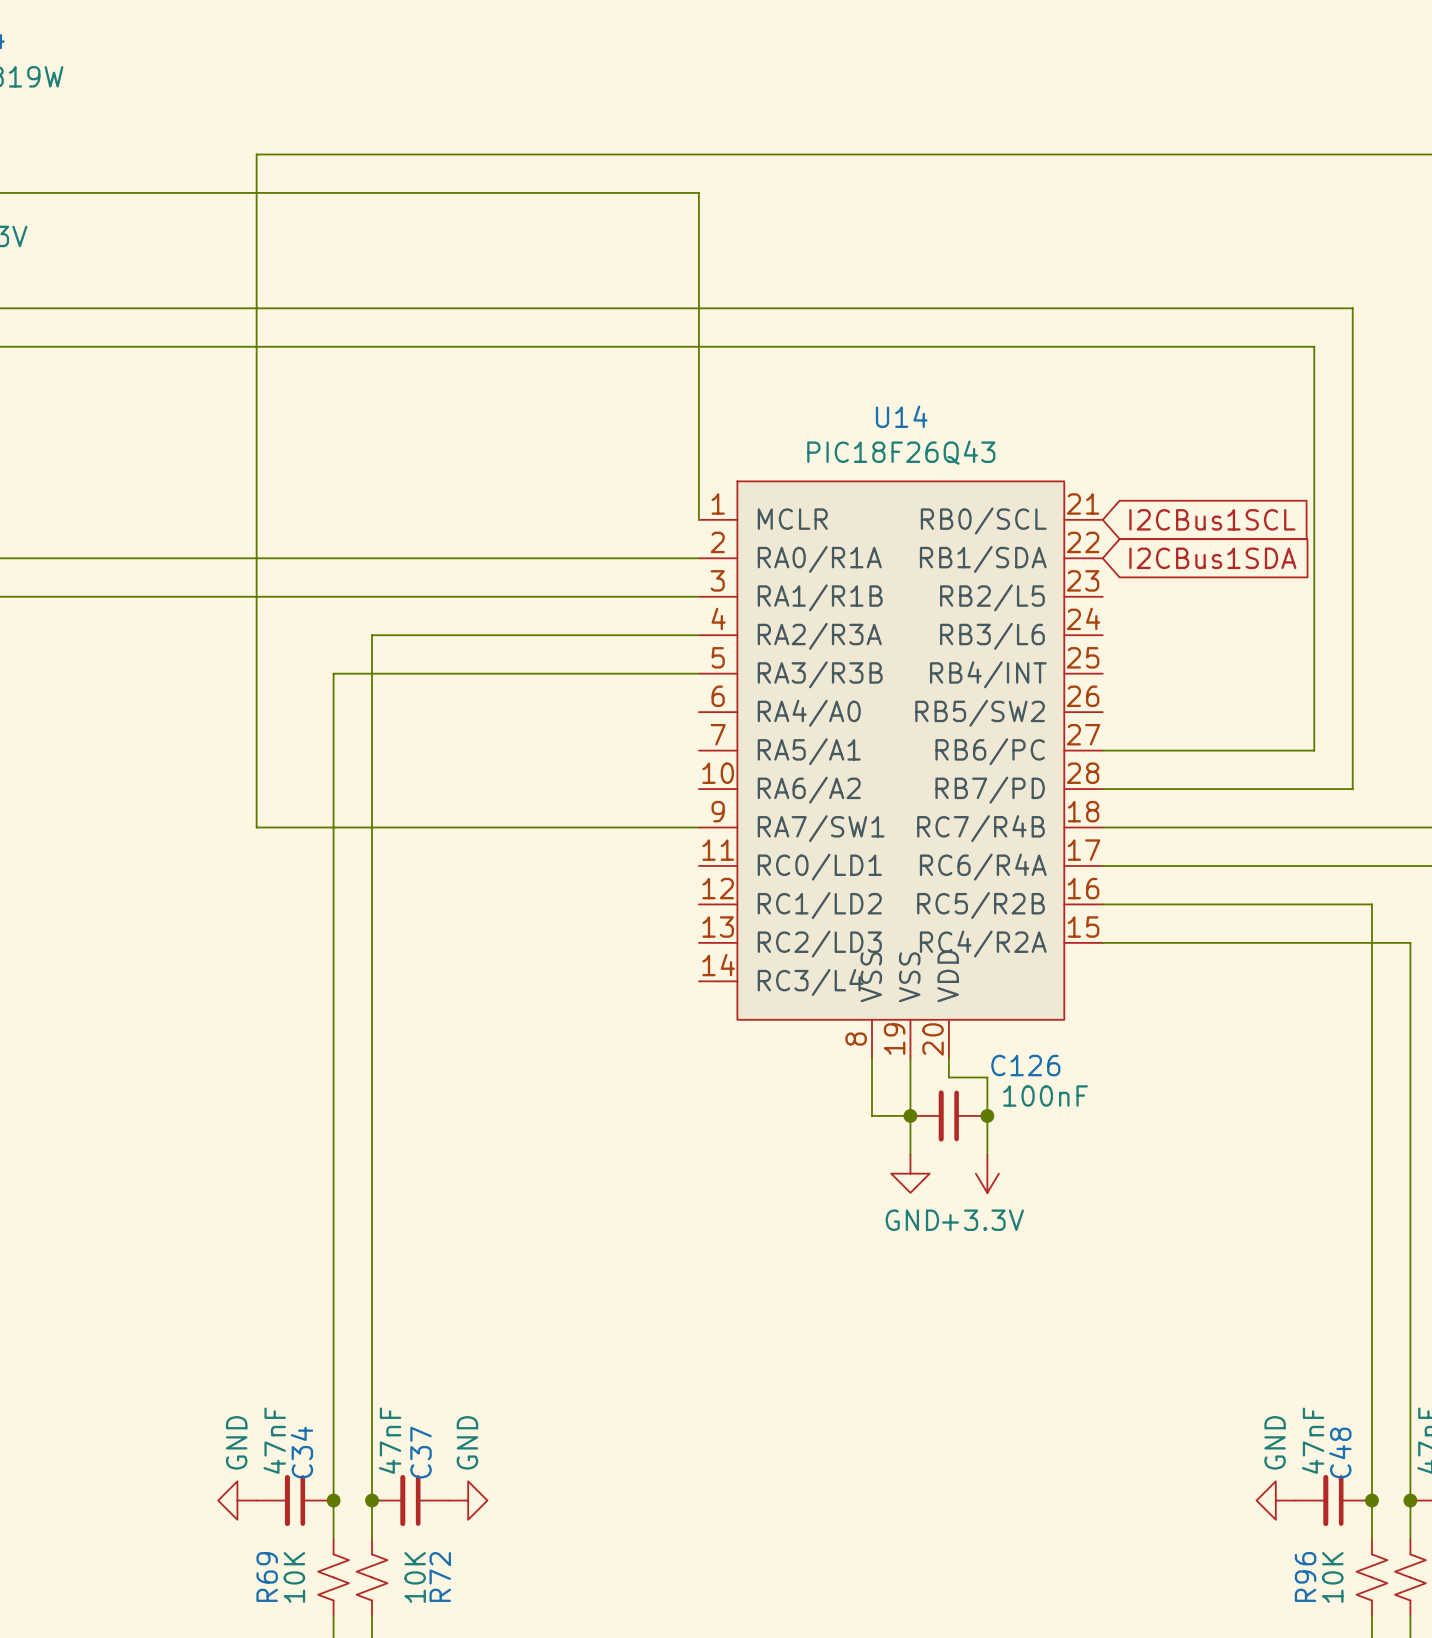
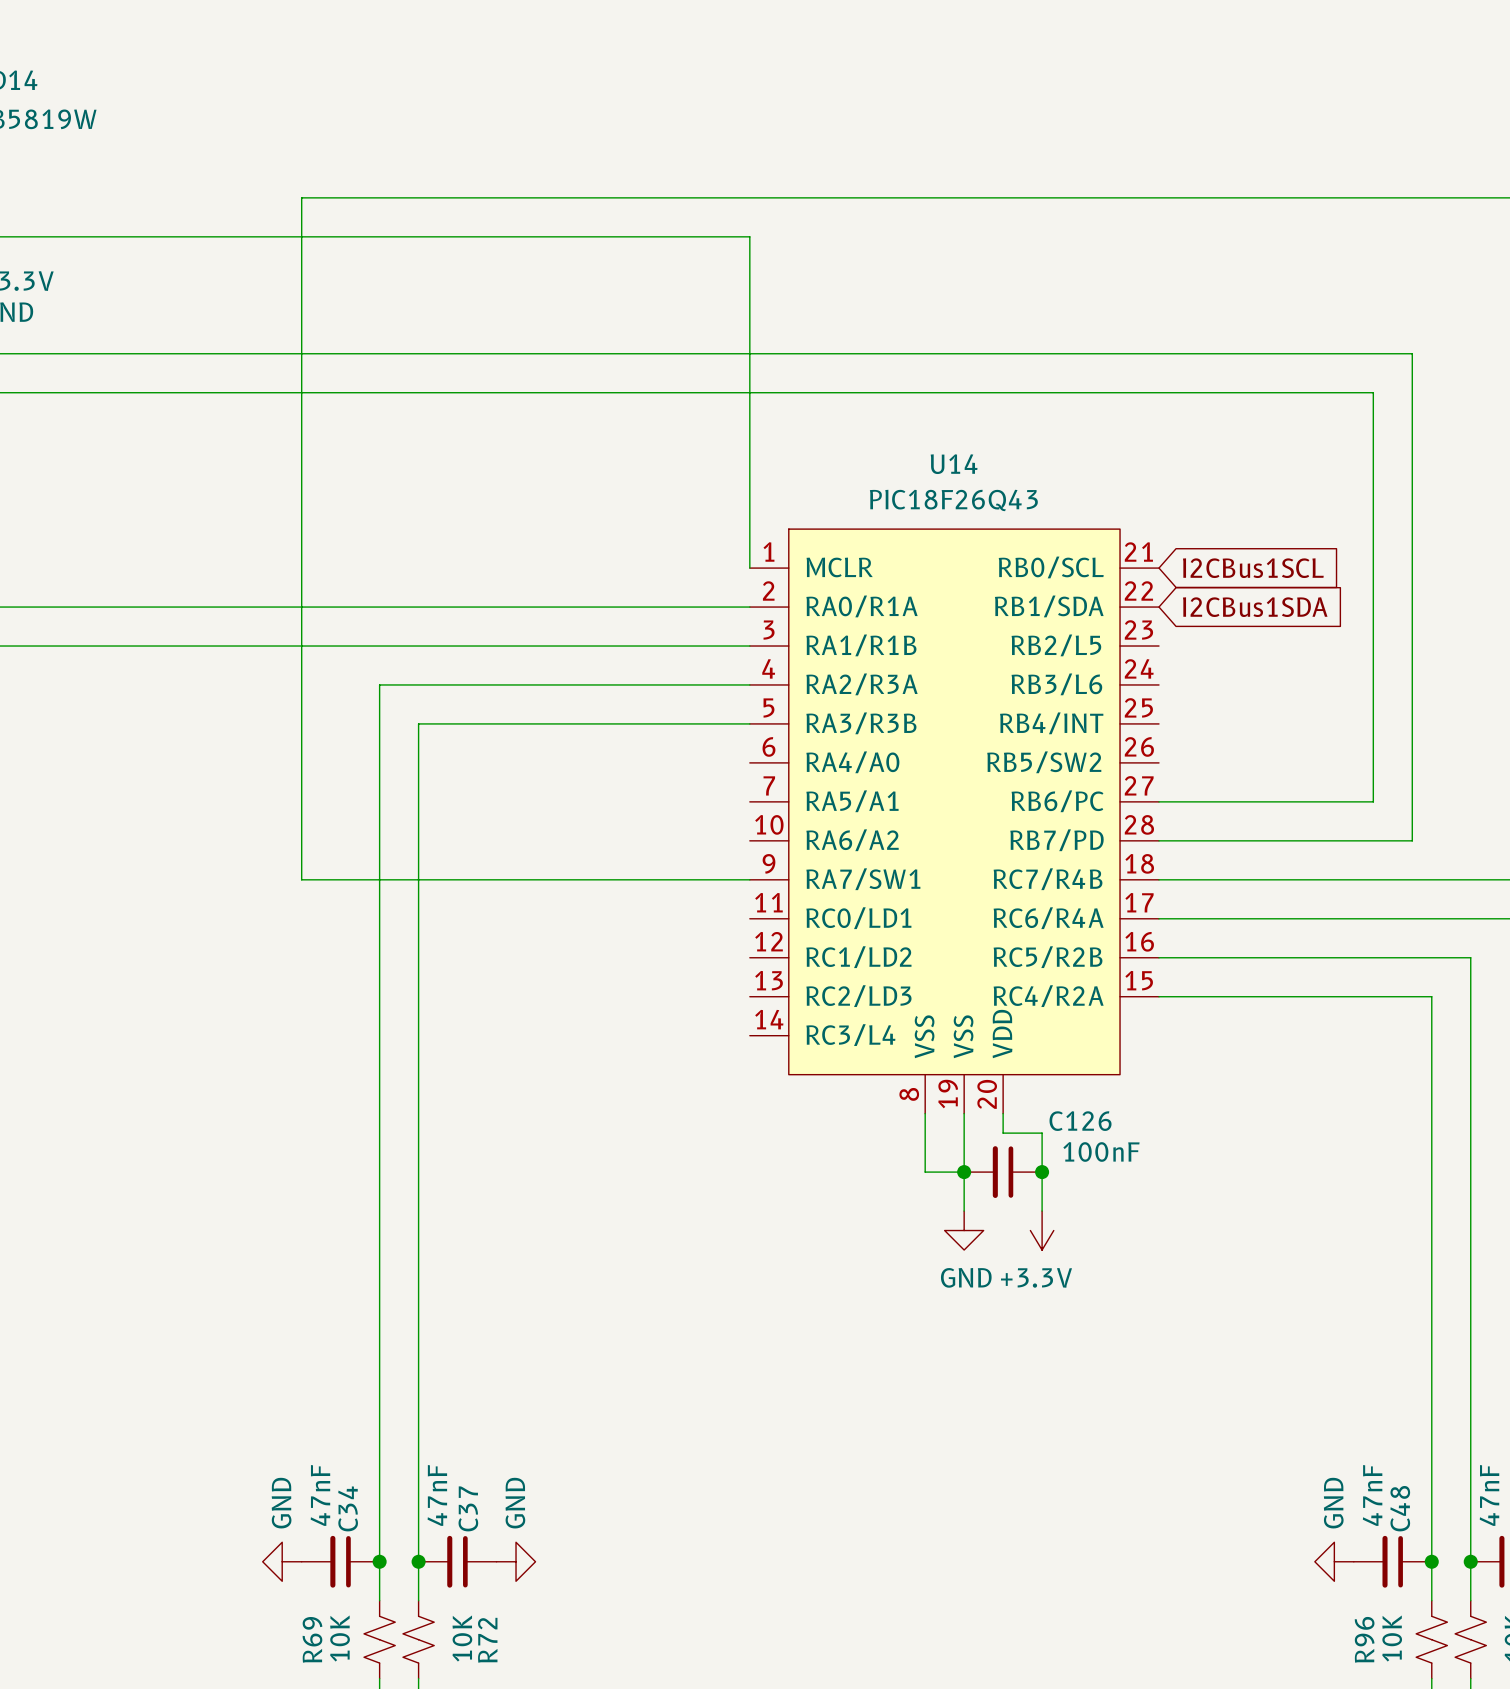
wire: (372, 635) (372, 673) (333, 673) -> (418, 684) (379, 684) (379, 723)
wire: (1371, 904) (1371, 942) (1410, 942) -> (1431, 957) (1470, 957) (1470, 996)

